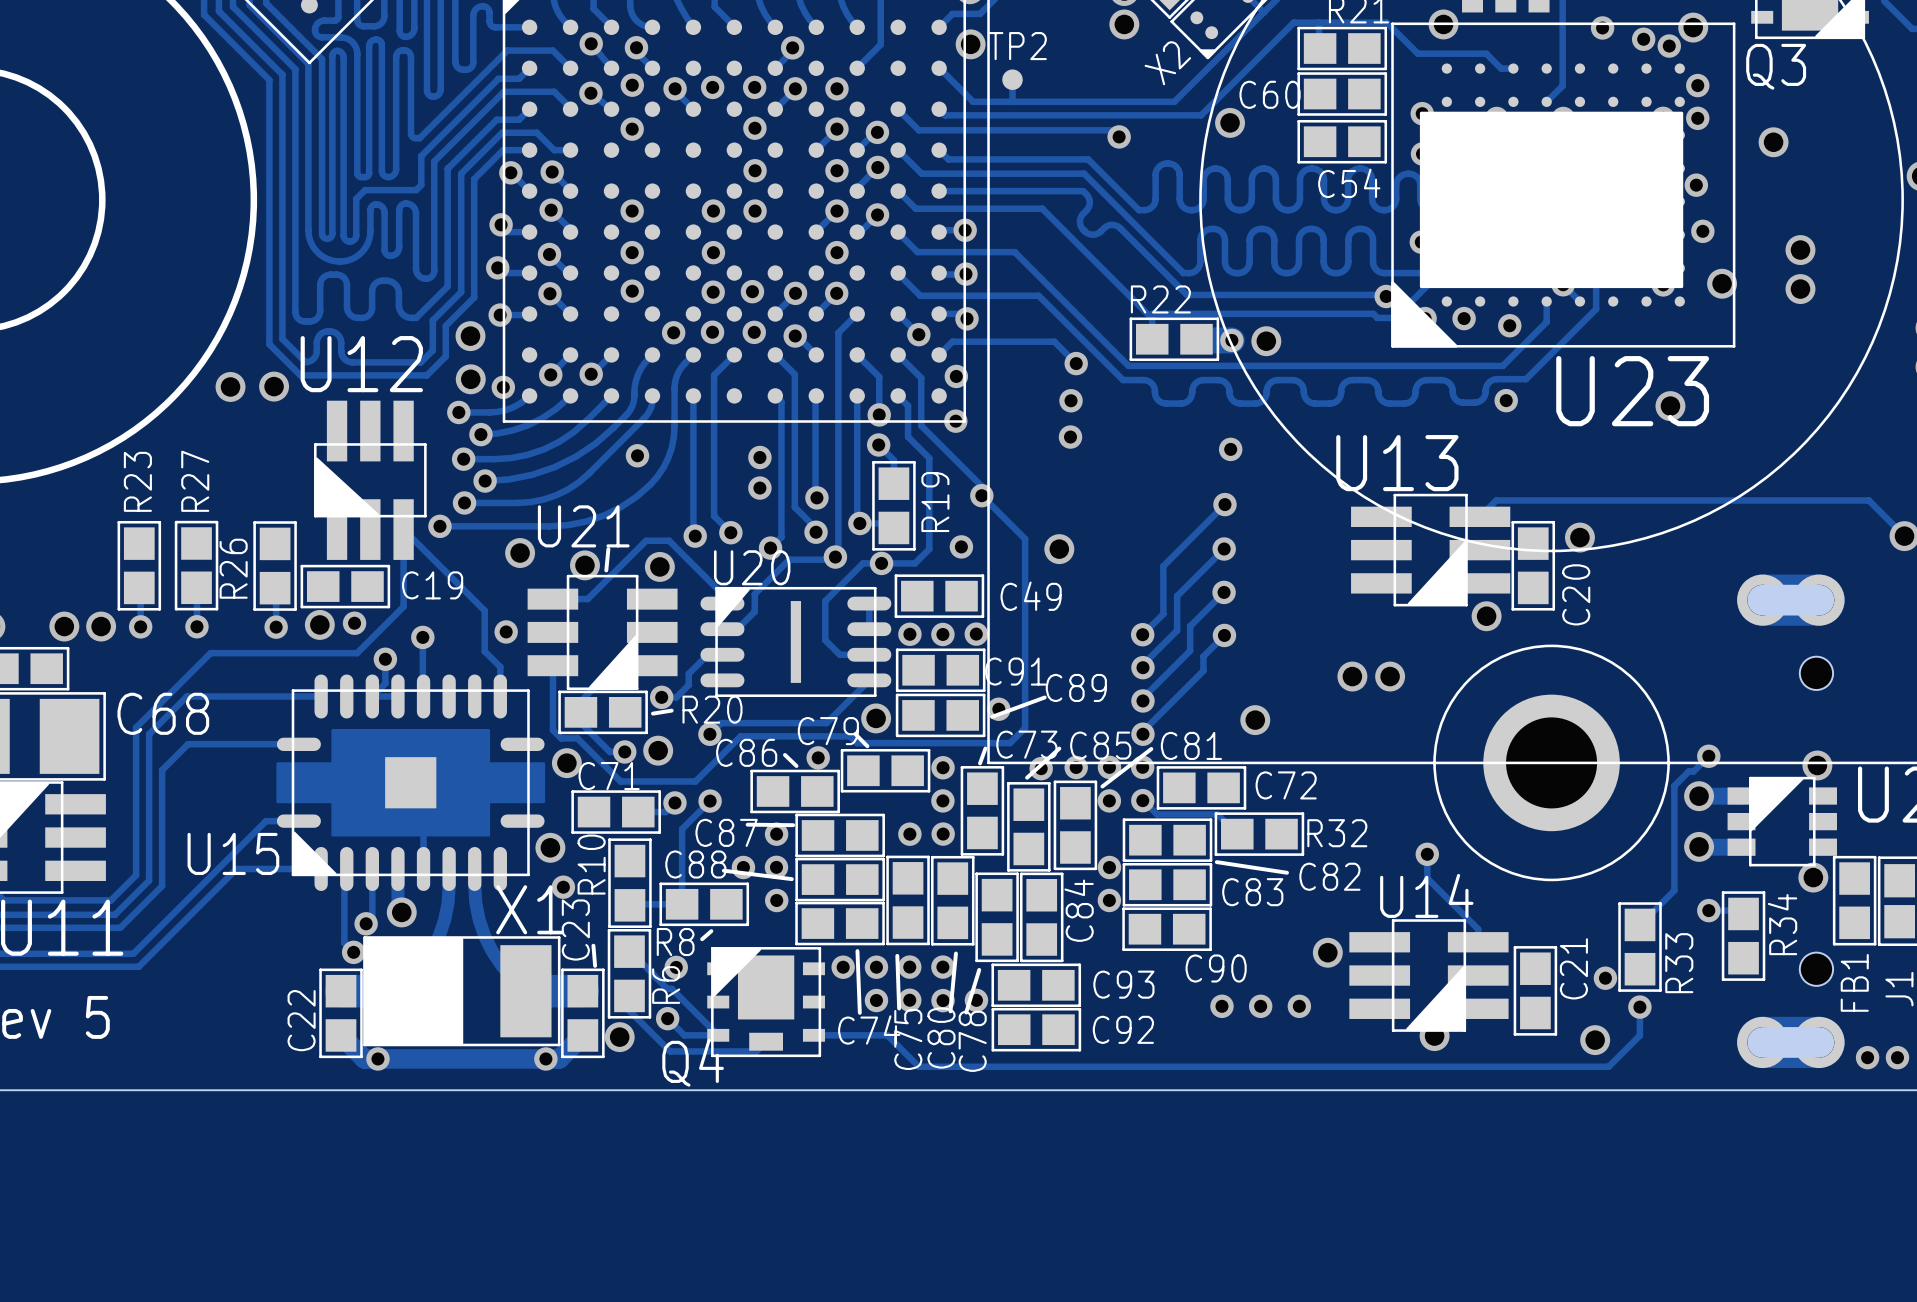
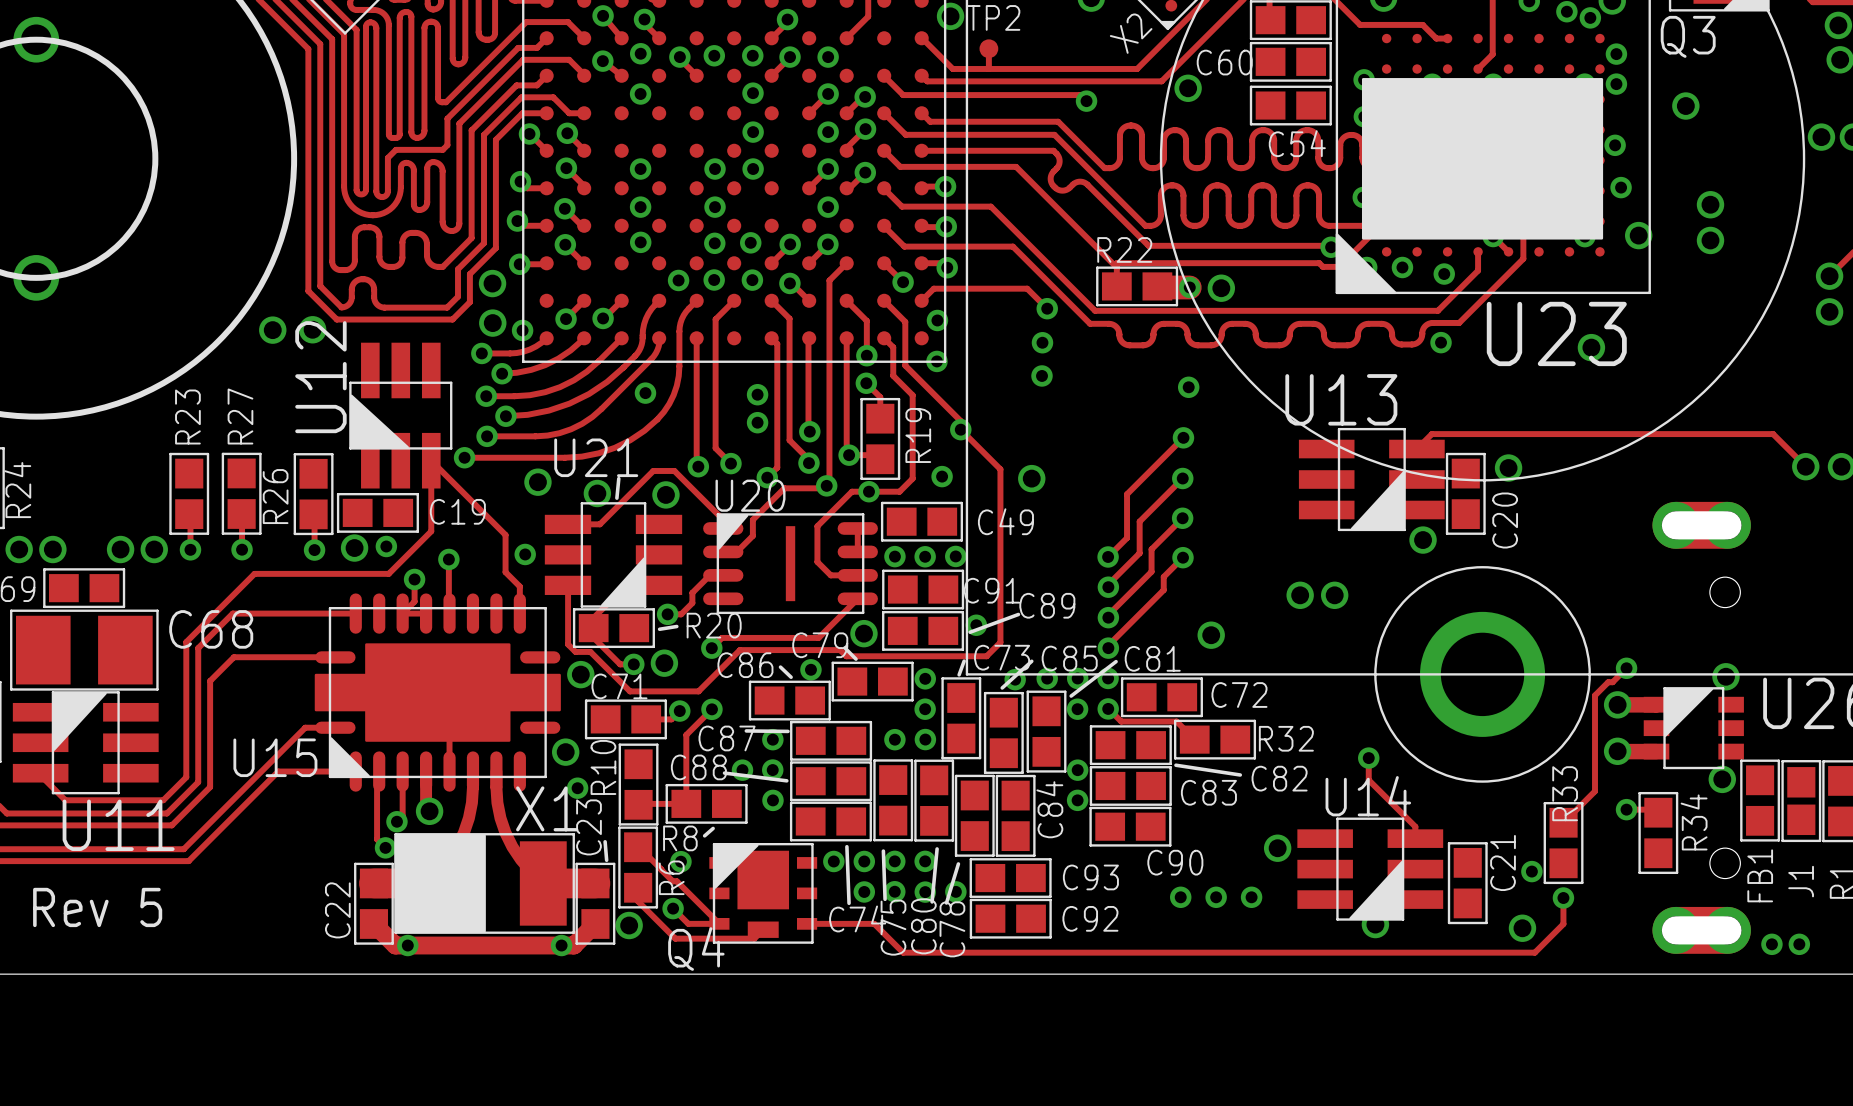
U12 name rotation: 0° (361, 364) -> 90° counterclockwise (320, 377)
R33 name position: R33 (1679, 963) -> R33 (1565, 793)

